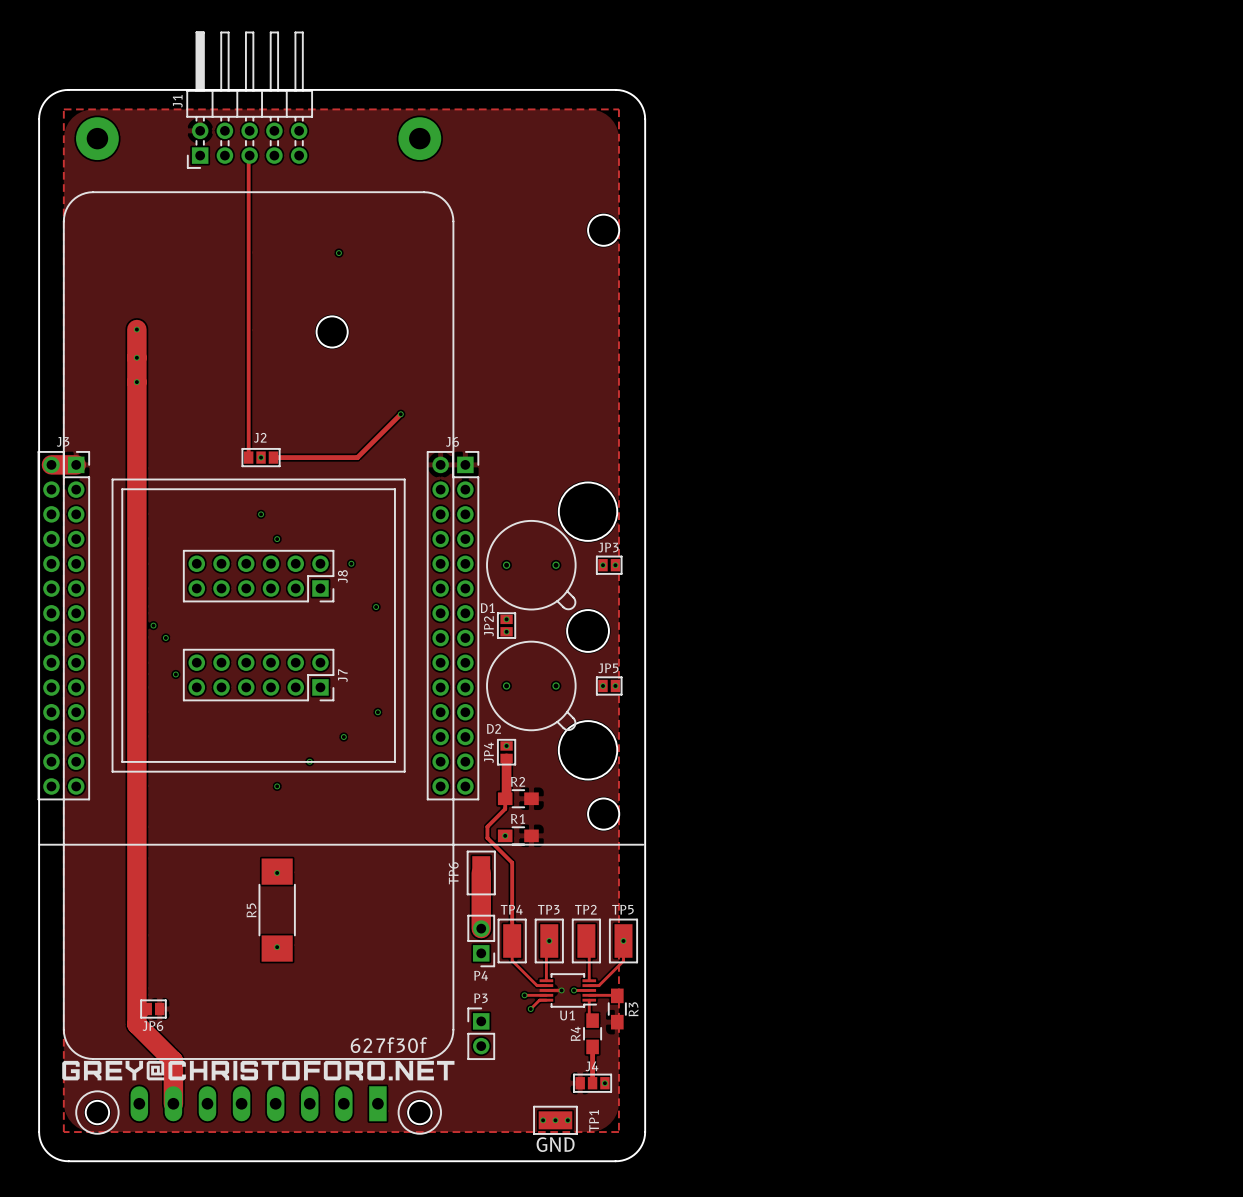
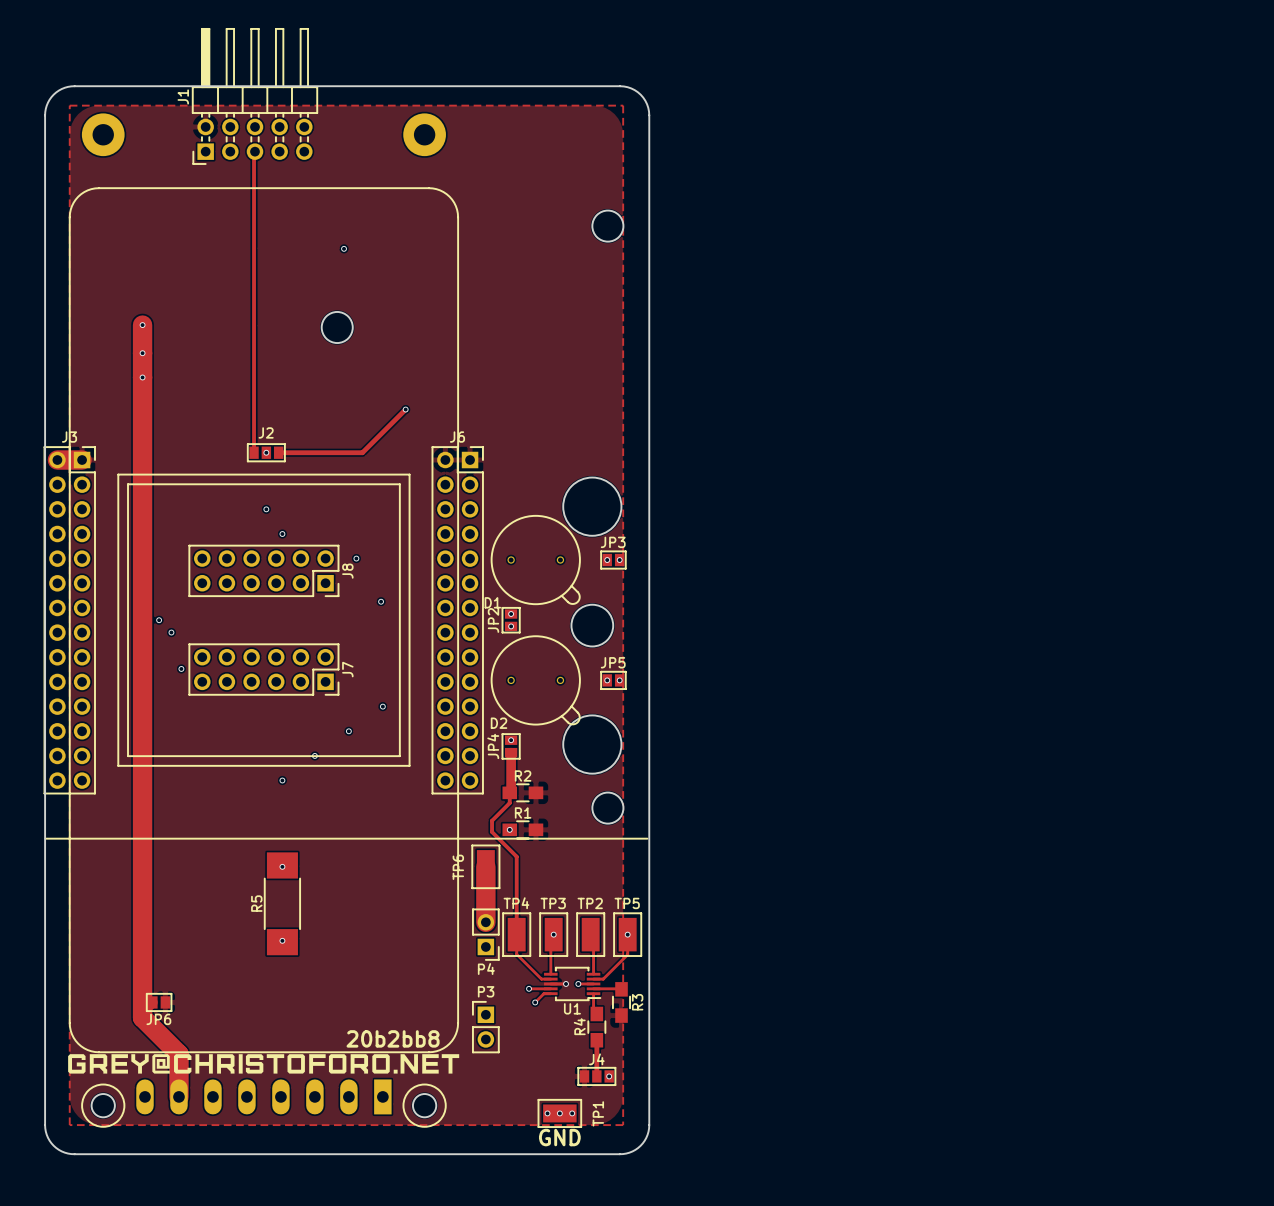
text: 627f30f (389, 1045) -> 20b2bb8 (393, 1038)

